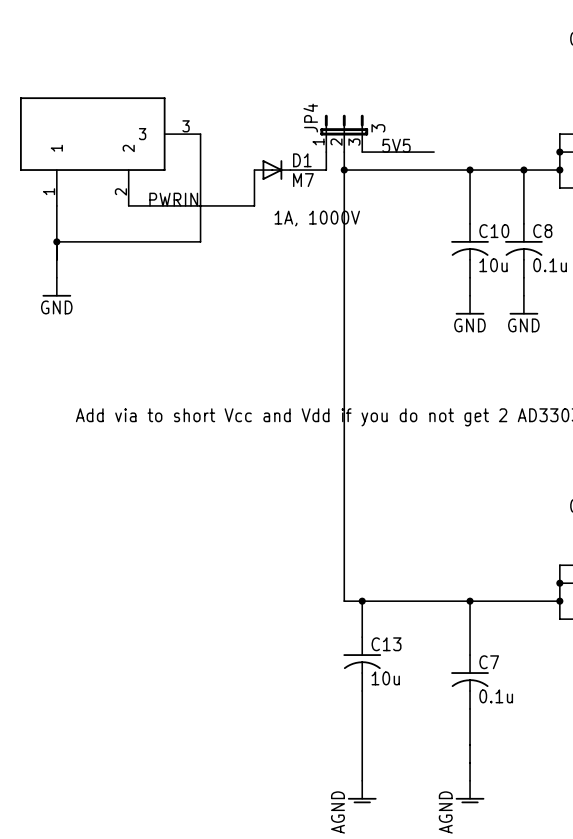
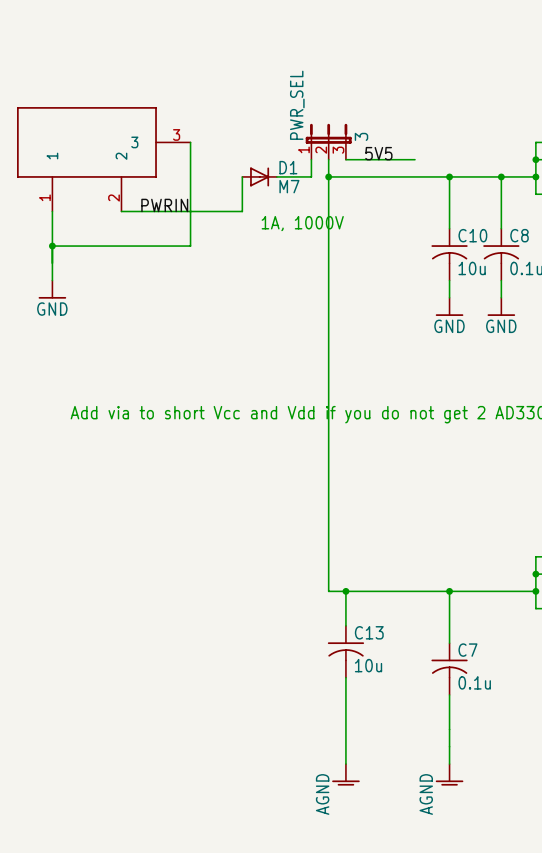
JP4 name: JP4 (310, 118) -> PWR_SEL (297, 105)

